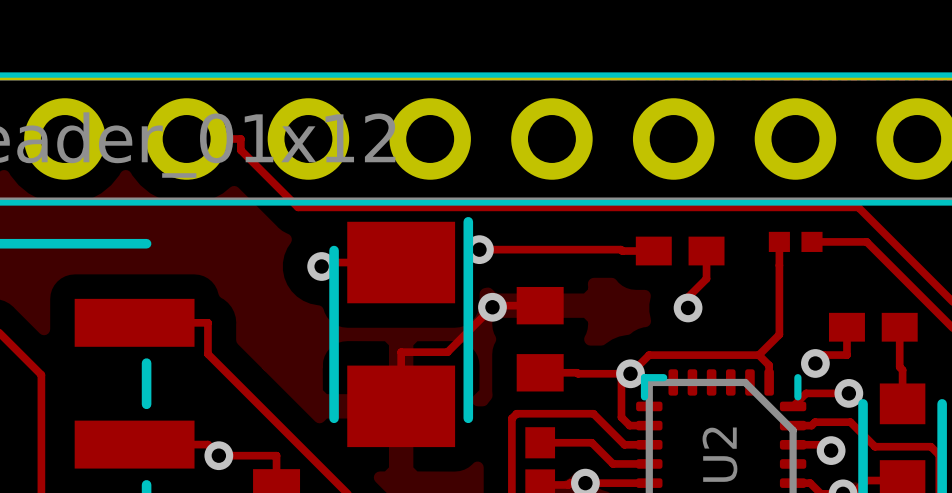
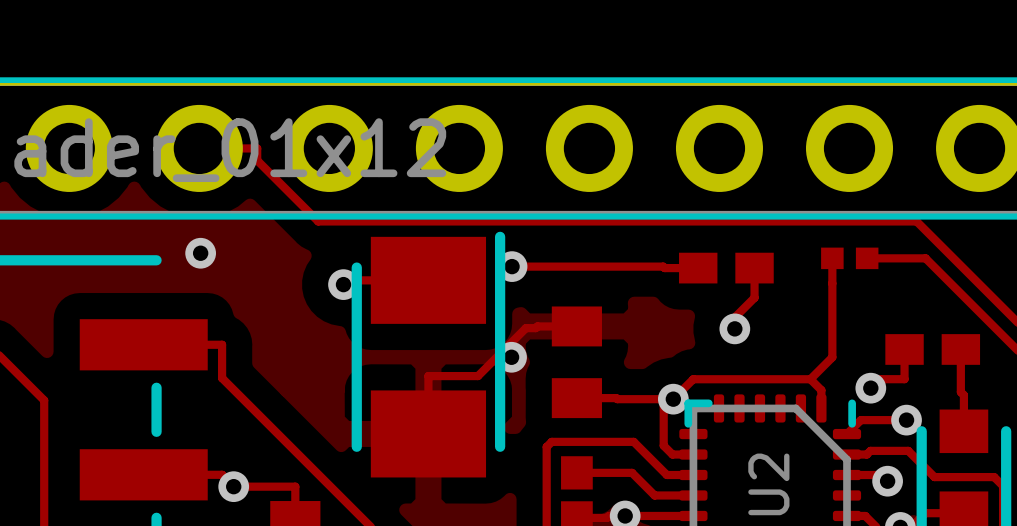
via: none -> (200, 253)
via position: (492, 307) -> (511, 357)

